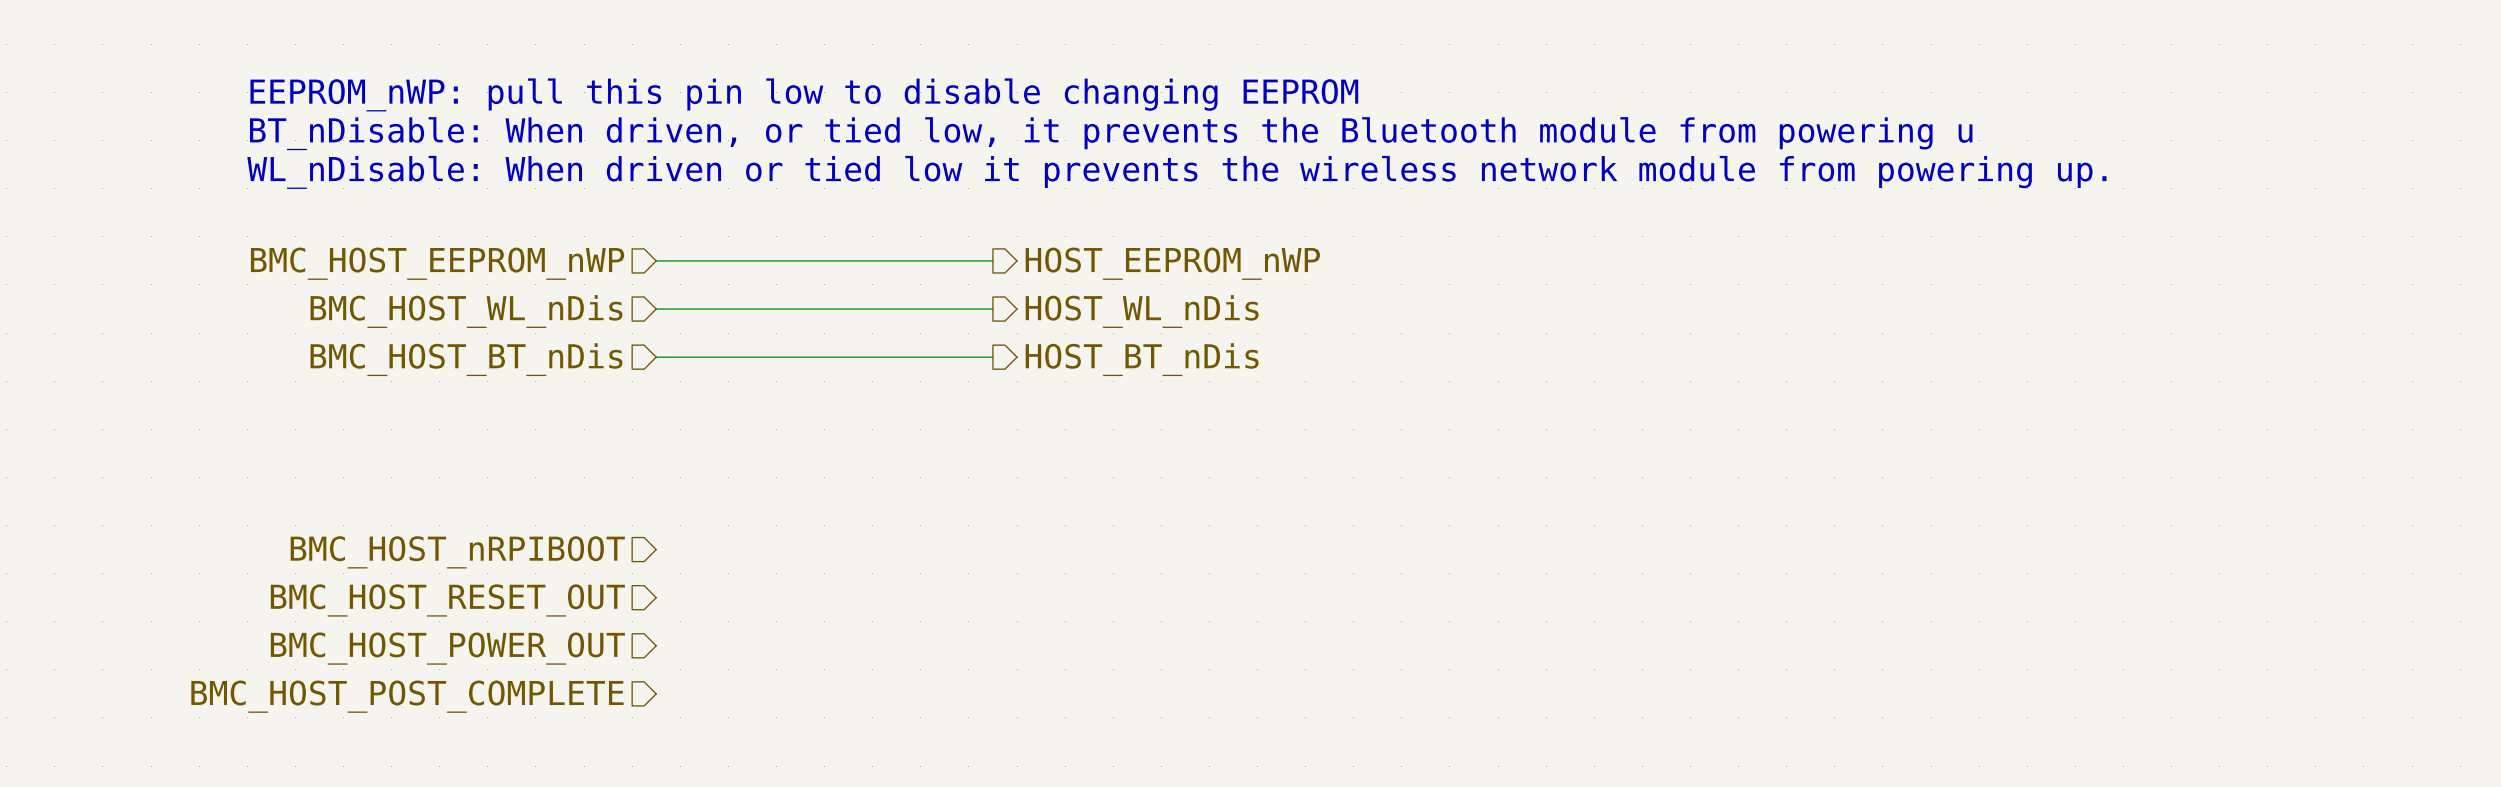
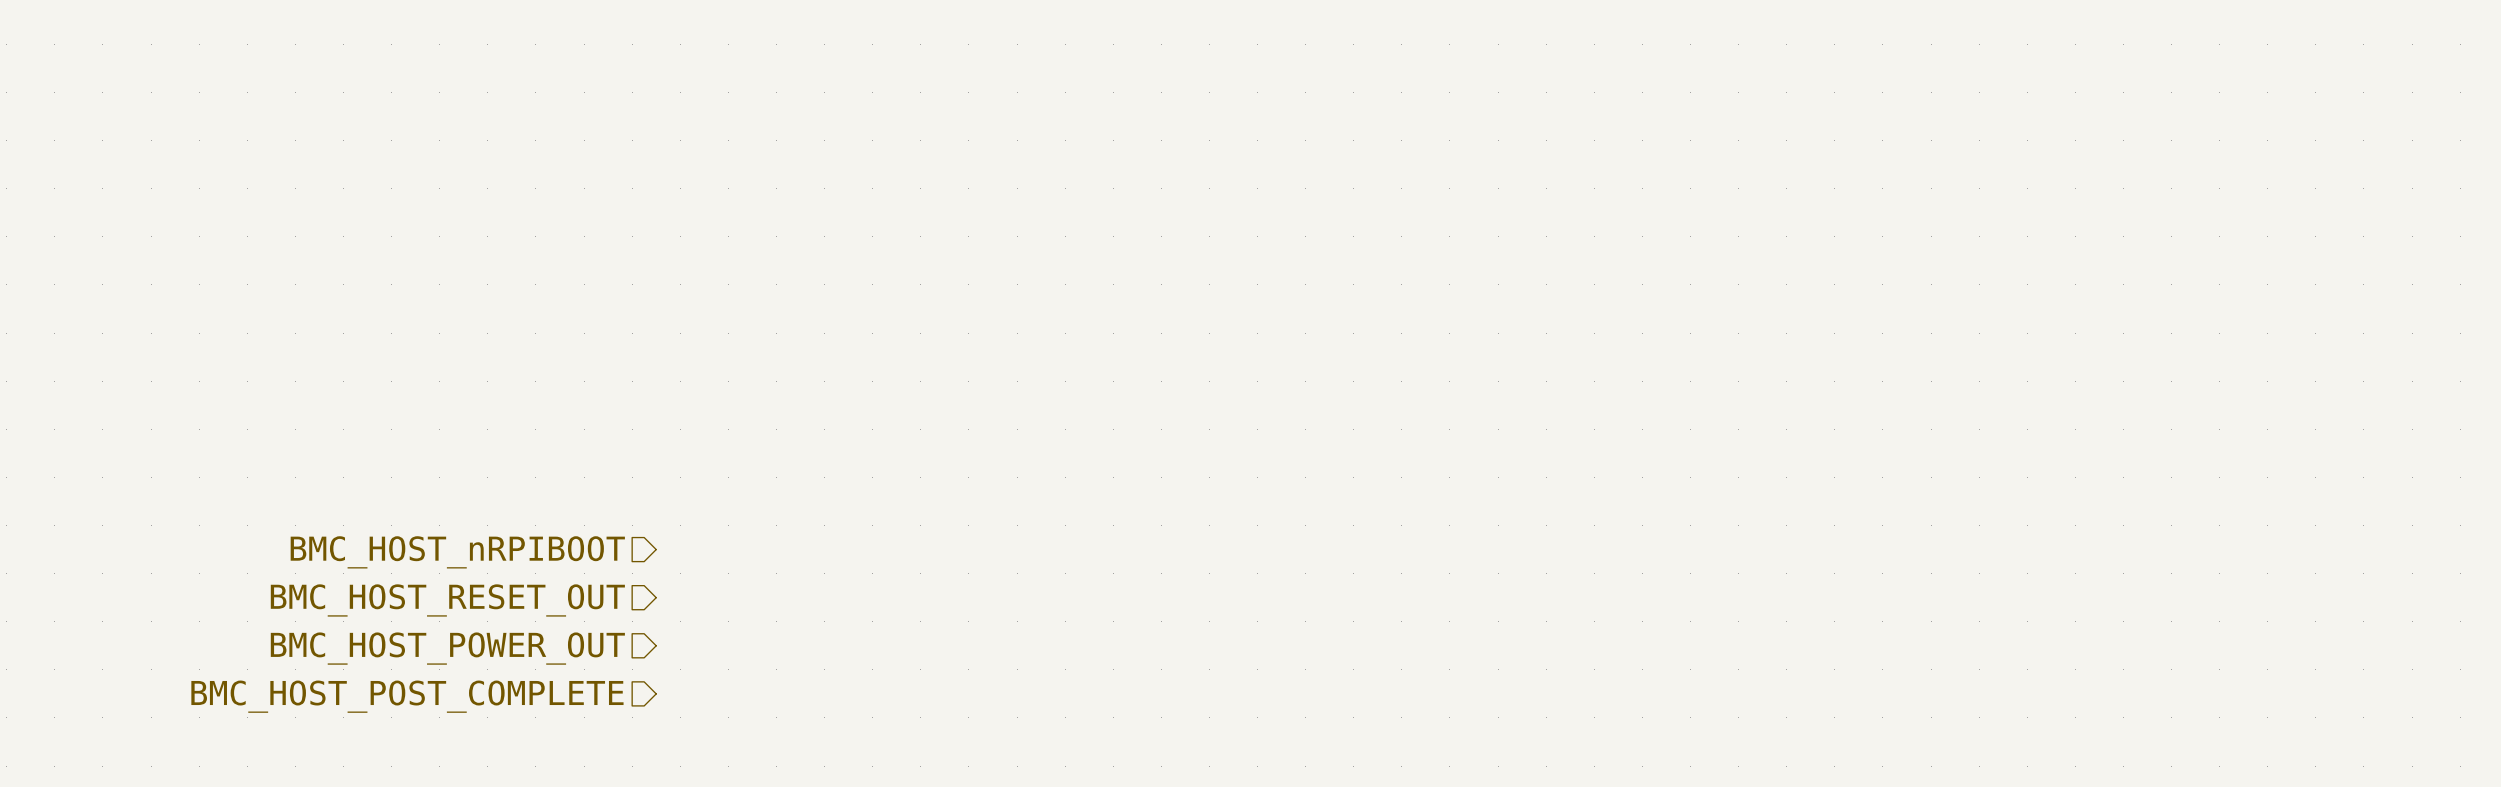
text: EEPROM_nWP: pull this pin low to disable changing EEPROM (804, 94) -> none
text: BT_nDisable: When driven, or tied low, it prevents the Bluetooth module from powering u (1111, 133) -> none
text: WL_nDisable: When driven or tied low it prevents the wireless network module from powering up. (1176, 172) -> none
wire: (656, 260) (992, 260) -> none
hierarchical label: BMC_HOST_EEPROM_nWP (437, 263) -> none
hierarchical label: HOST_EEPROM_nWP (1172, 263) -> none
wire: (656, 309) (992, 309) -> none
hierarchical label: BMC_HOST_WL_nDis (466, 311) -> none
hierarchical label: HOST_WL_nDis (1142, 311) -> none
wire: (656, 357) (992, 357) -> none
hierarchical label: BMC_HOST_BT_nDis (466, 359) -> none
hierarchical label: HOST_BT_nDis (1142, 359) -> none

